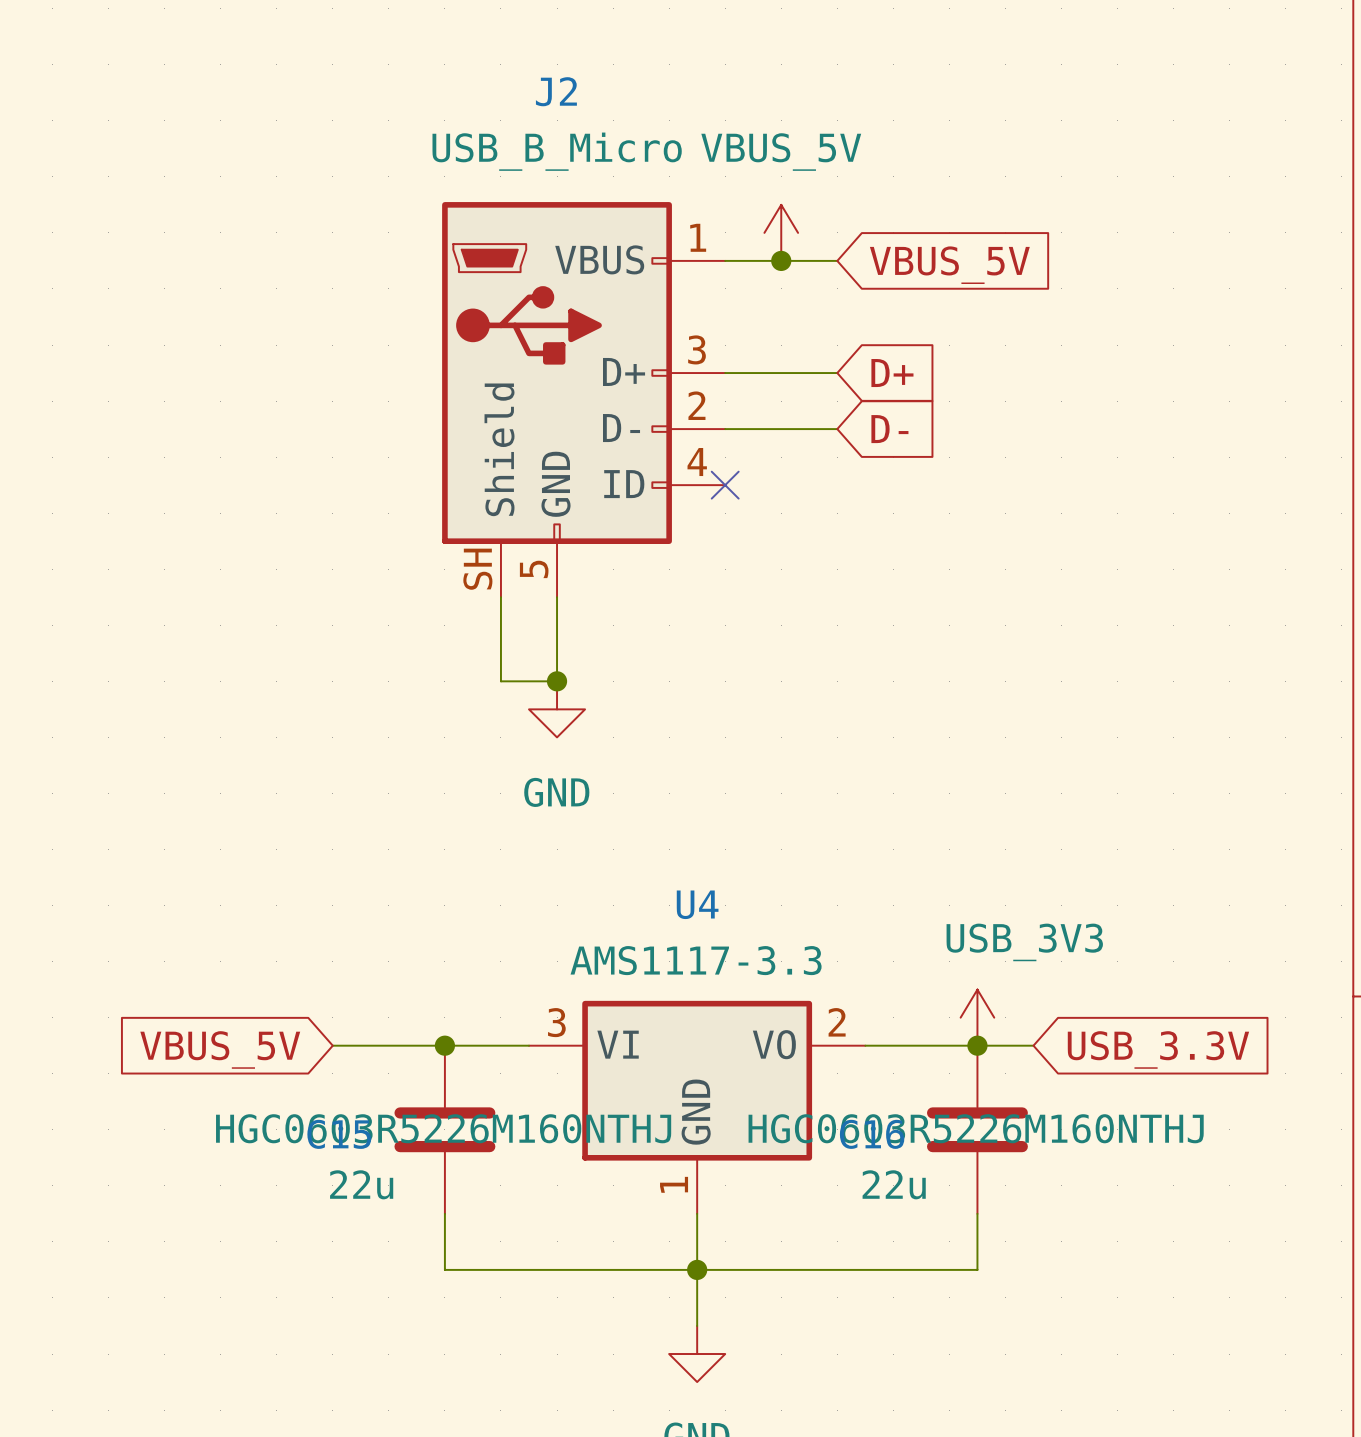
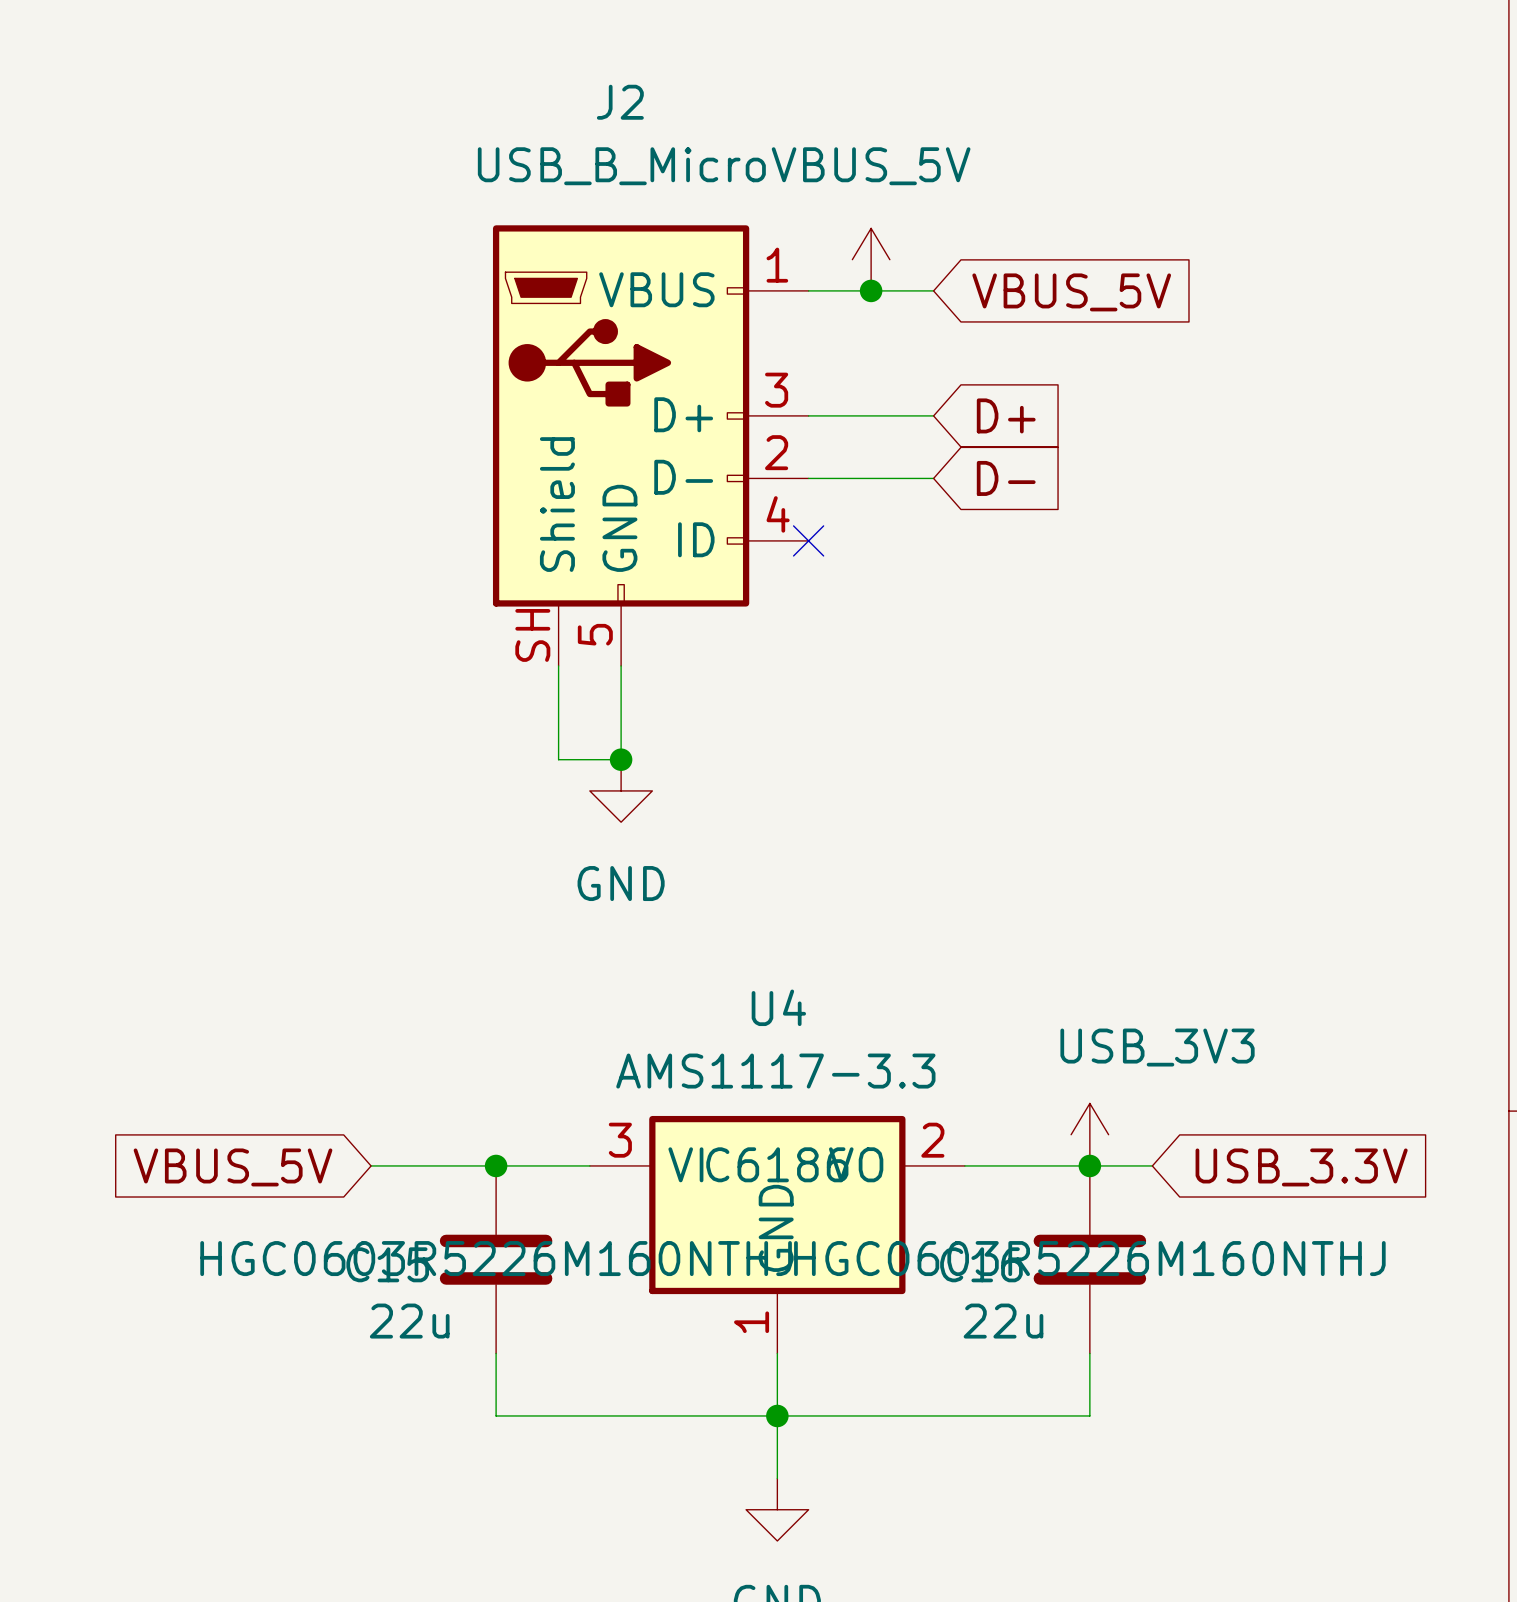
U4 text: none -> C6186 (777, 1164)

